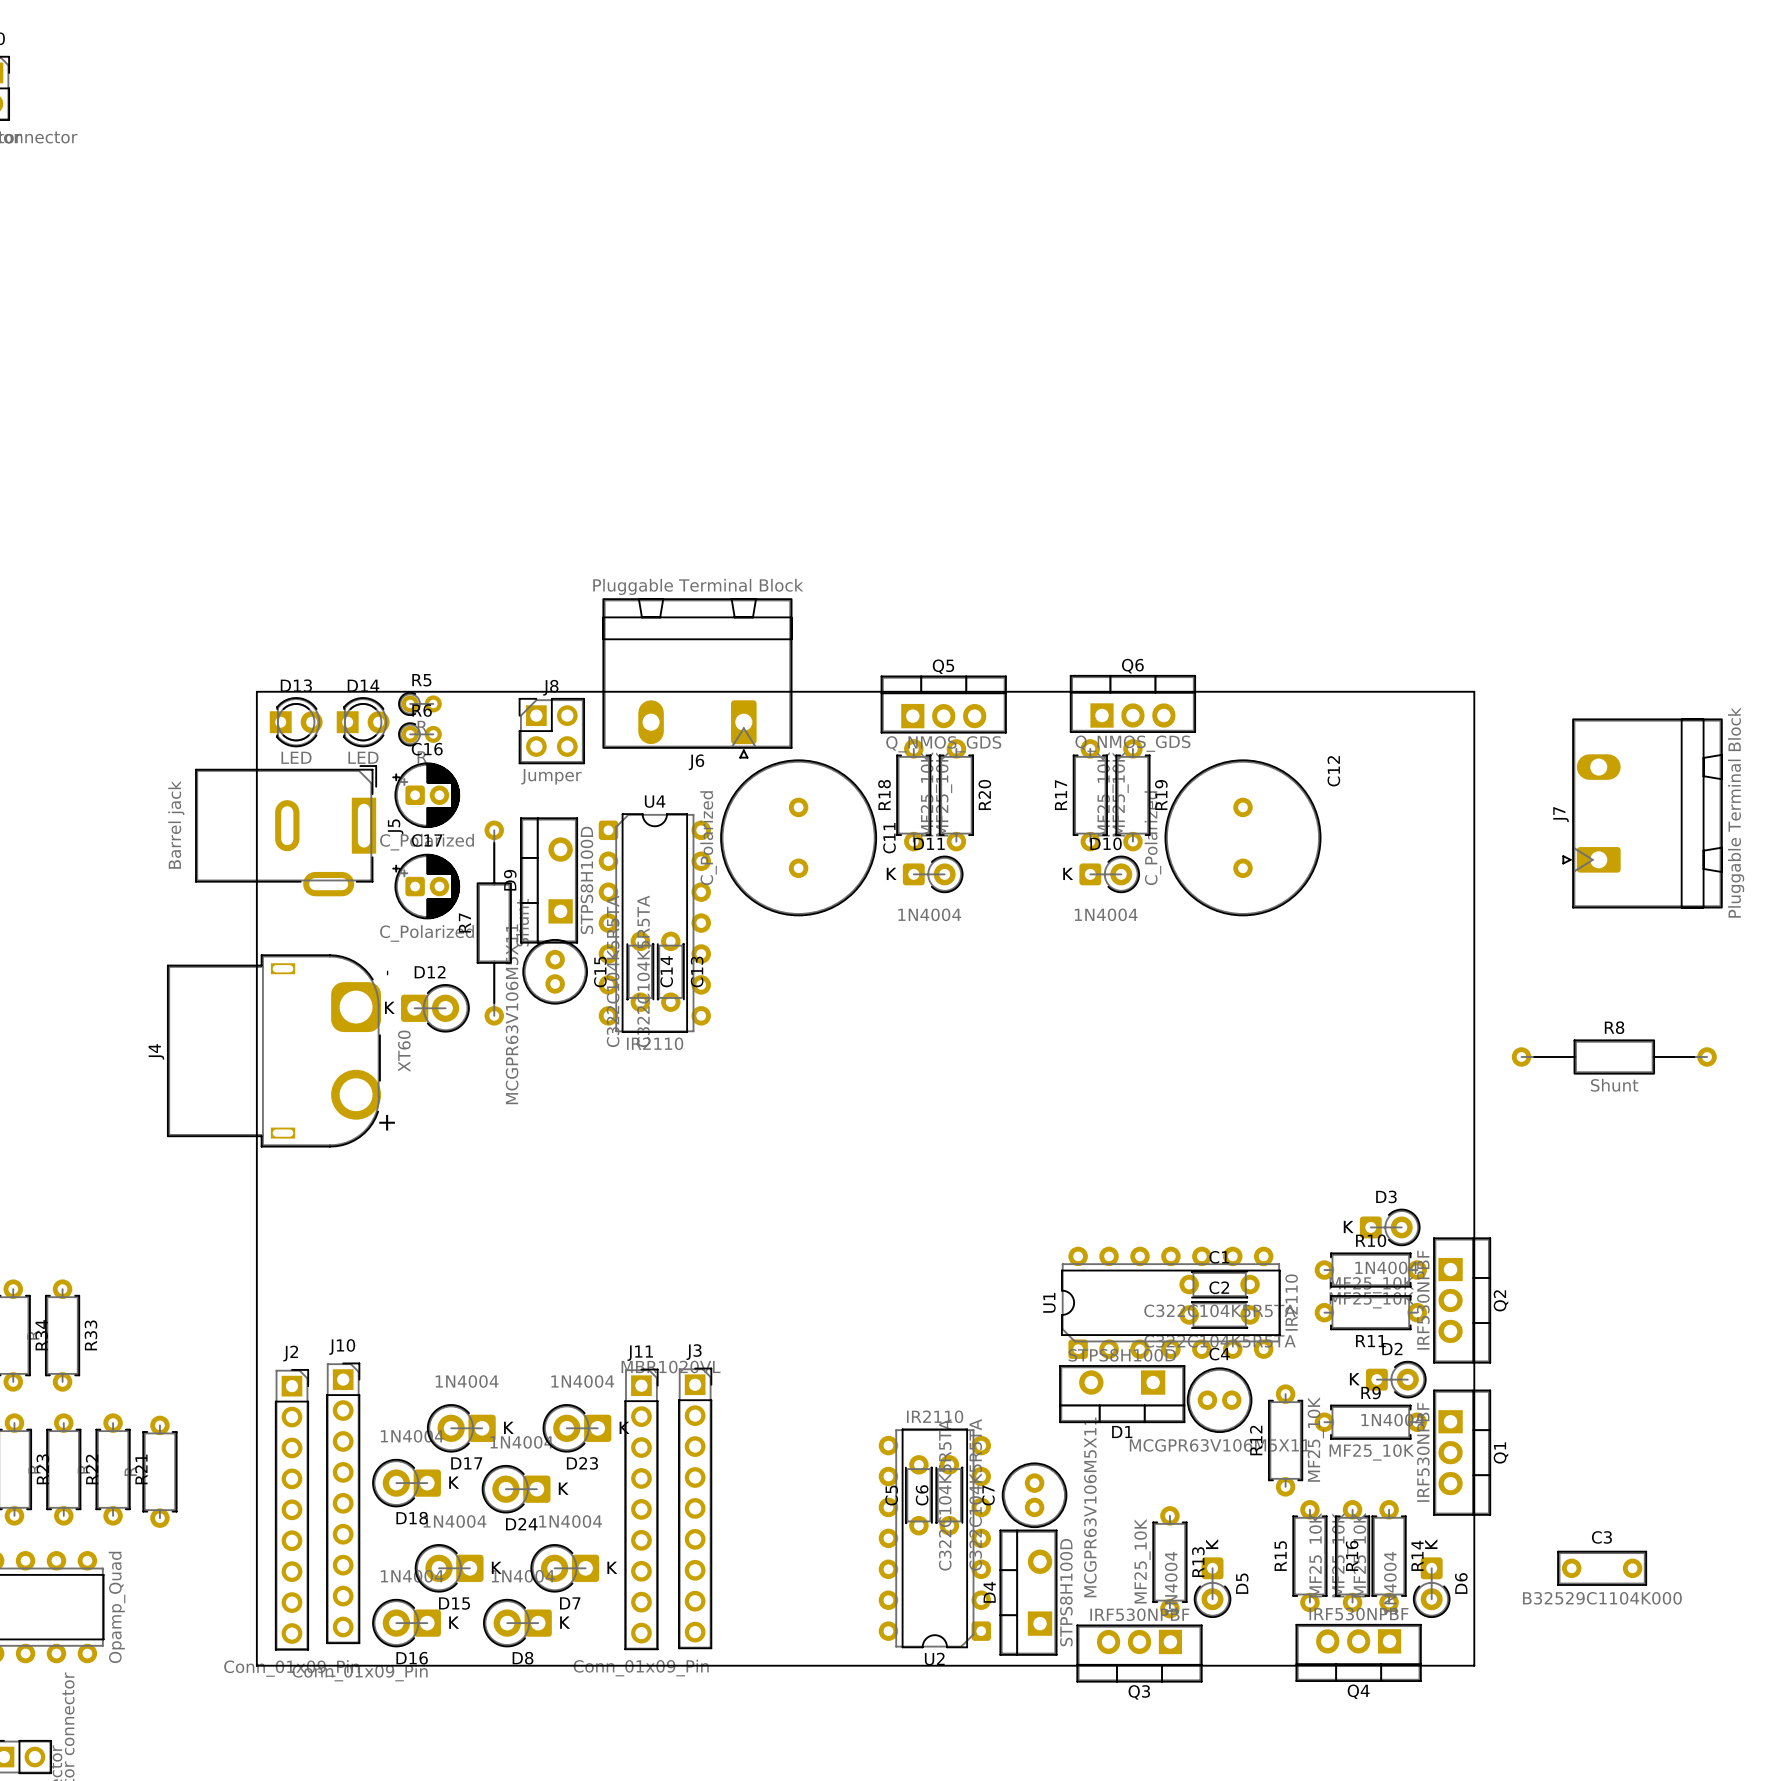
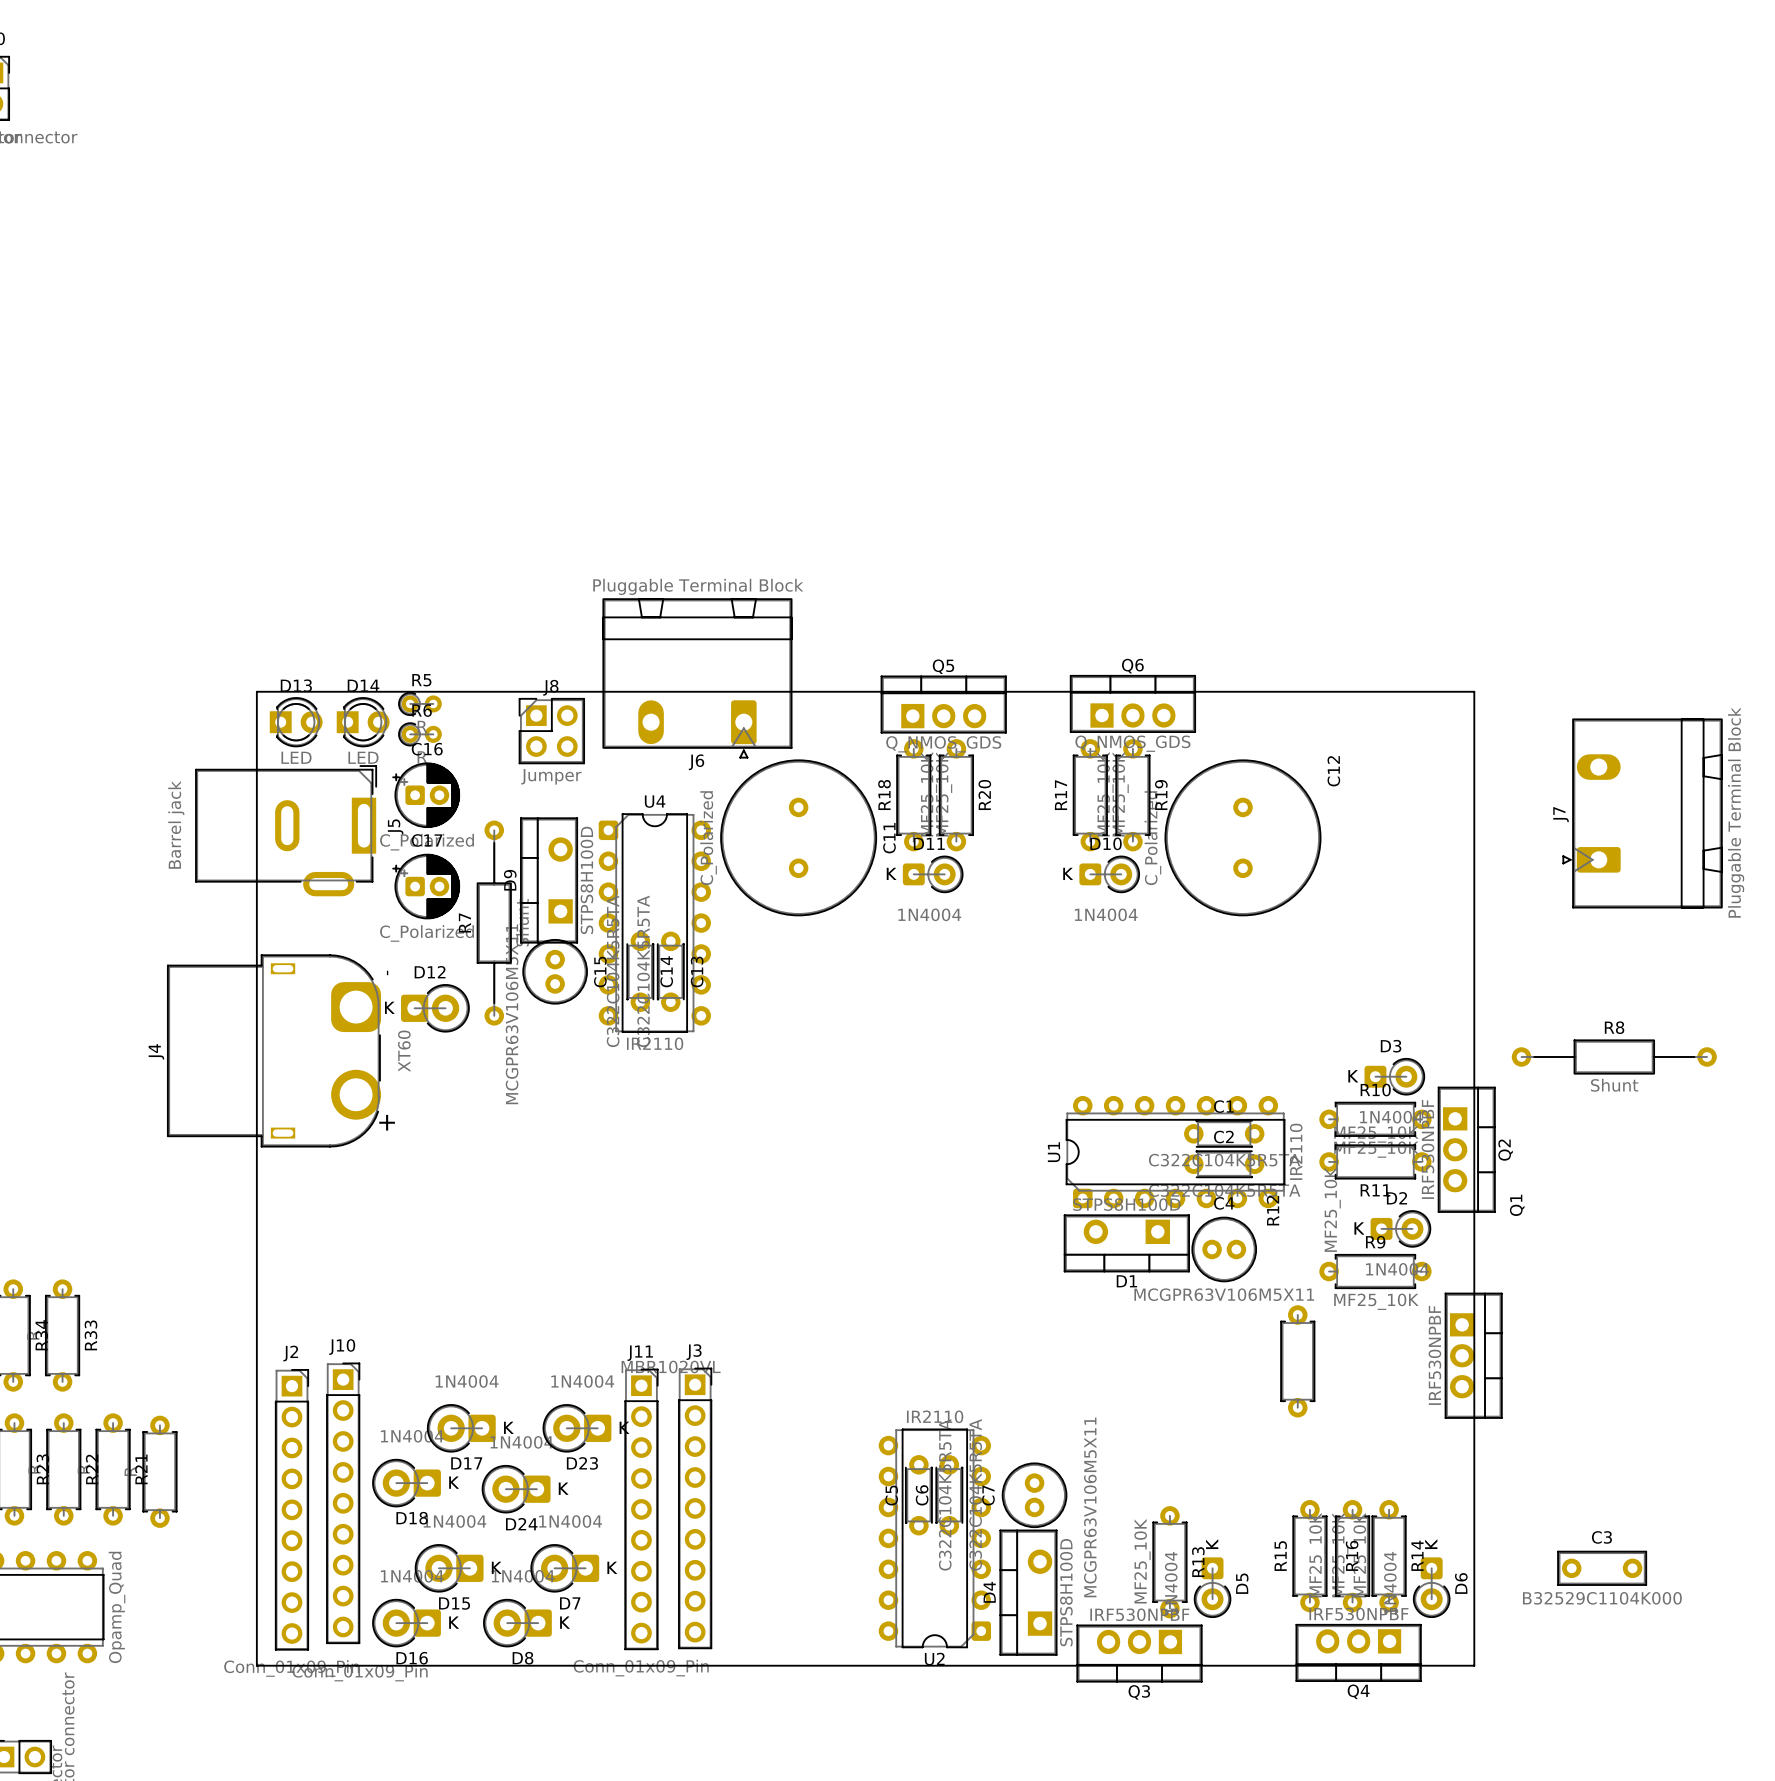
D3 position: (1390, 1227) -> (1394, 1076)
R10 position: (1370, 1270) -> (1375, 1119)
C1 position: (1219, 1284) -> (1224, 1133)
Q2 position: (1462, 1300) -> (1466, 1149)
U1 position: (1170, 1302) -> (1175, 1152)
R11 position: (1370, 1312) -> (1375, 1161)
C2 position: (1219, 1314) -> (1224, 1164)
D2 position: (1396, 1379) -> (1400, 1228)
D1 position: (1122, 1394) -> (1126, 1243)
C4 position: (1219, 1400) -> (1224, 1249)
R9 position: (1370, 1422) -> (1375, 1271)
R12 value position: MF25_10K (1315, 1439) -> MF25_10K (1332, 1209)
R12 name position: R12 (1256, 1440) -> R12 (1272, 1210)
R12 position: (1285, 1440) -> (1297, 1361)
Q1 position: (1462, 1452) -> (1473, 1355)
Q1 name position: Q1 (1500, 1452) -> Q1 (1517, 1205)

